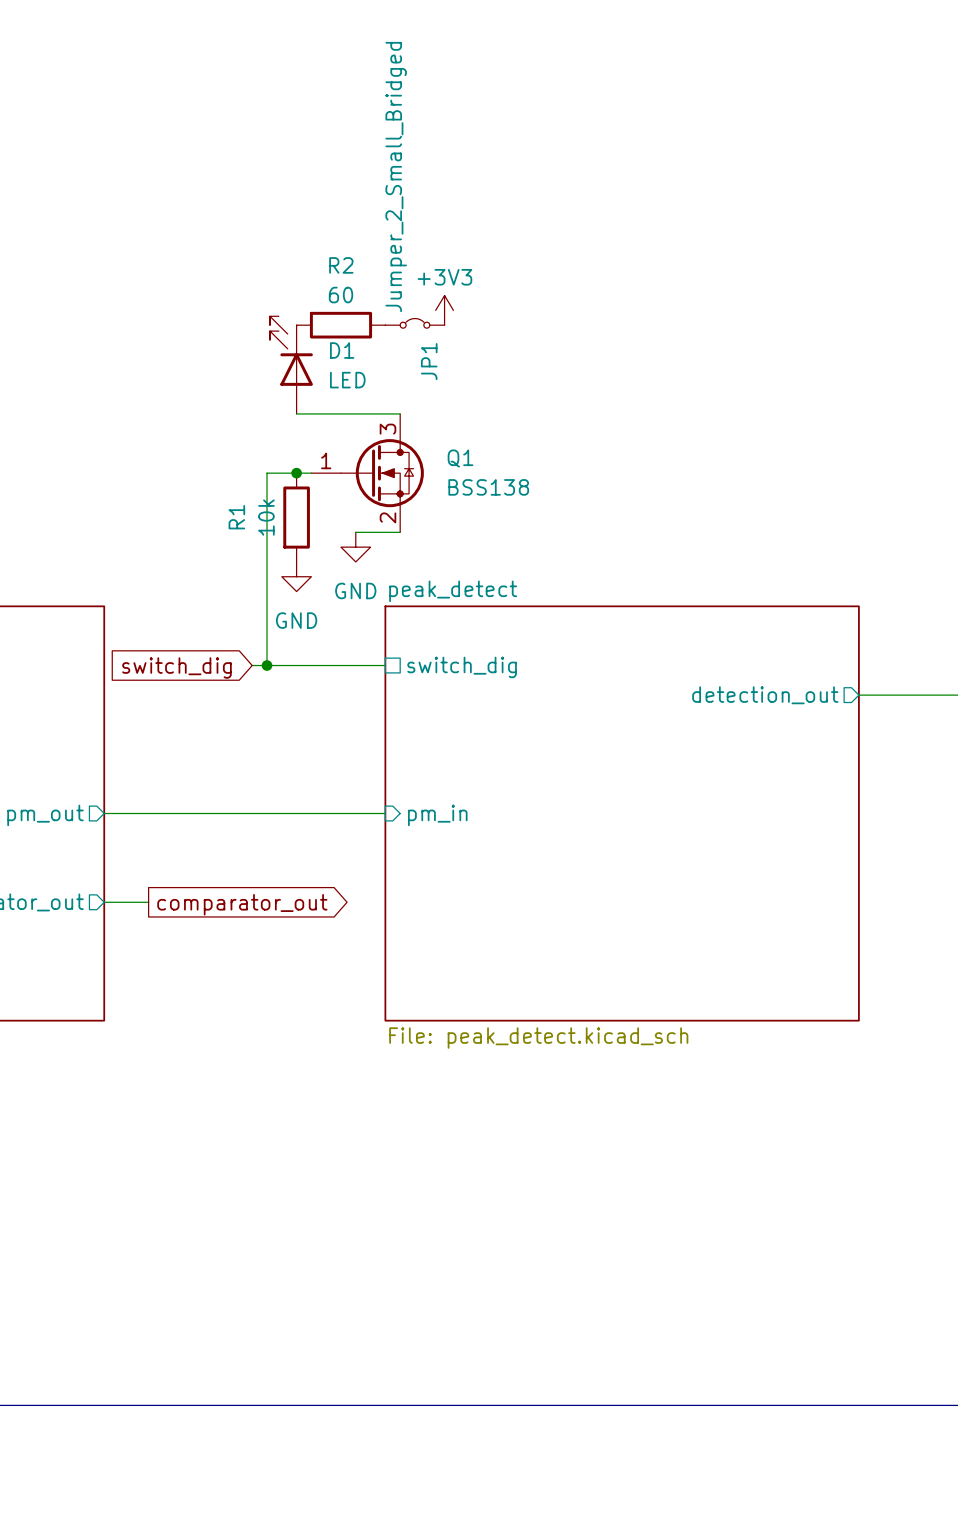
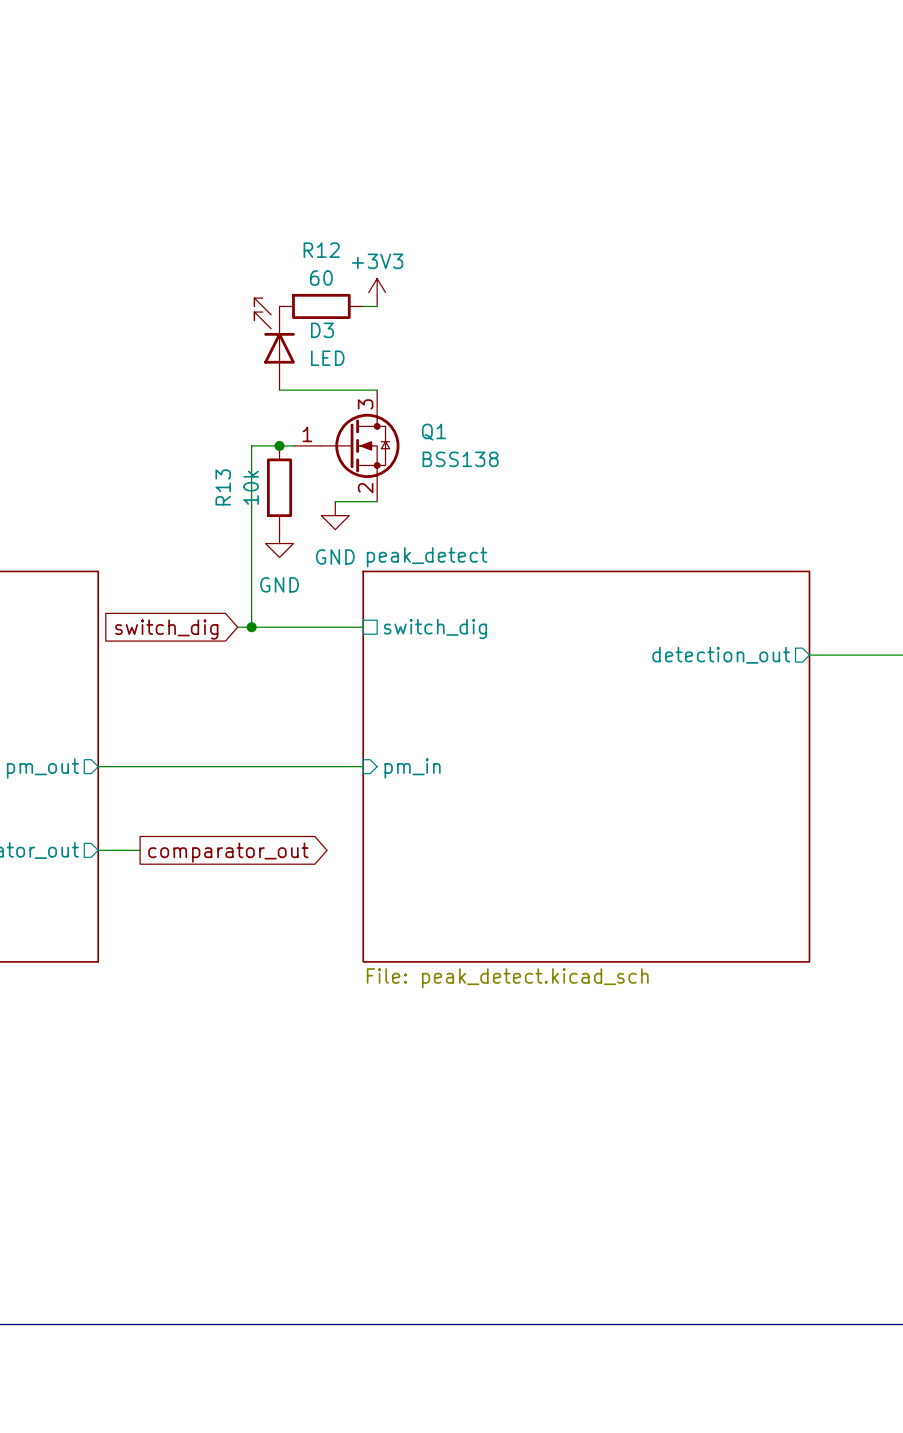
R2 name: R2 (341, 265) -> R12 (321, 250)
power symbol position: +3V3 (444, 310) -> +3V3 (377, 292)
JP1: Jumper_2_Small_Bridged (414, 323) -> none
D1 name: D1 (342, 350) -> D3 (322, 330)
R1 name: R1 (236, 517) -> R13 (223, 487)

